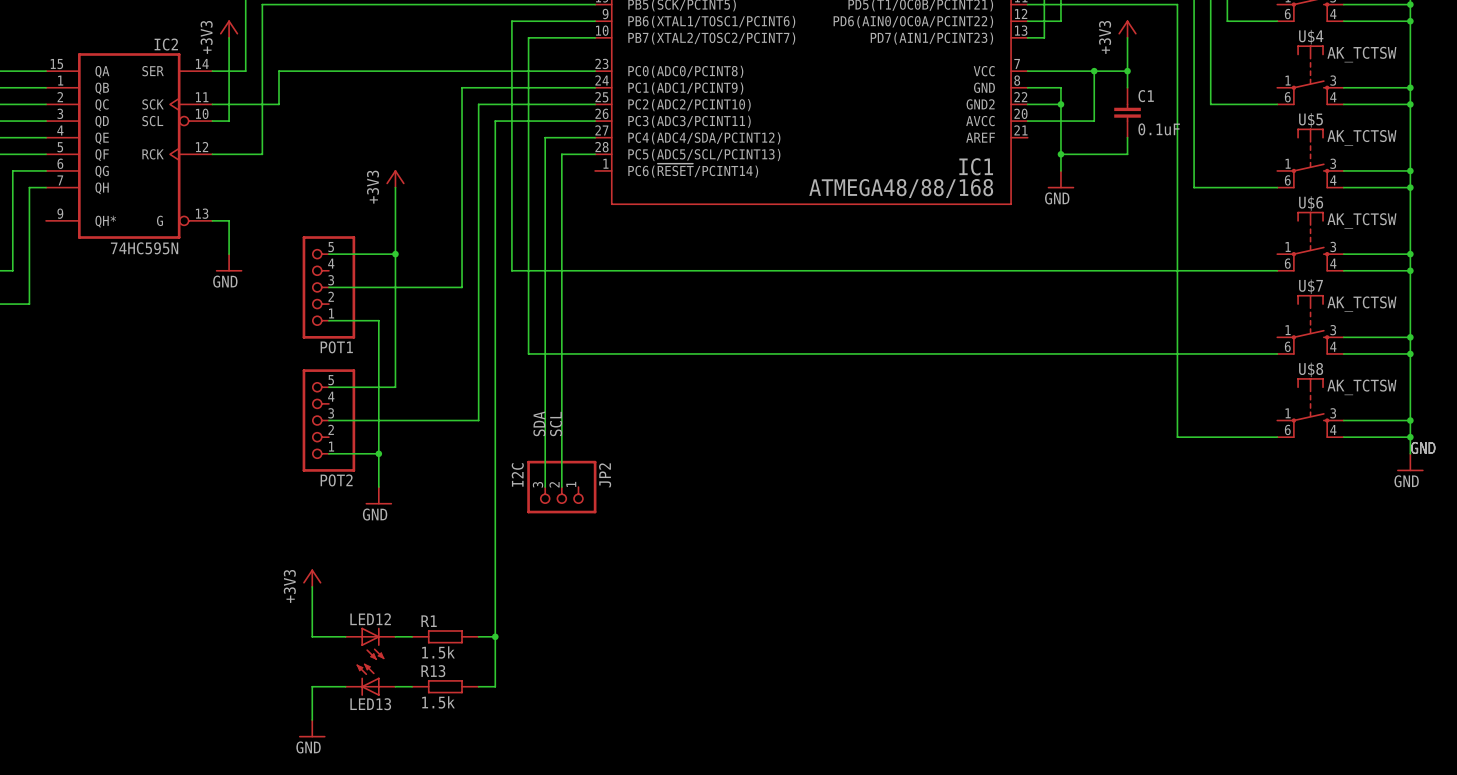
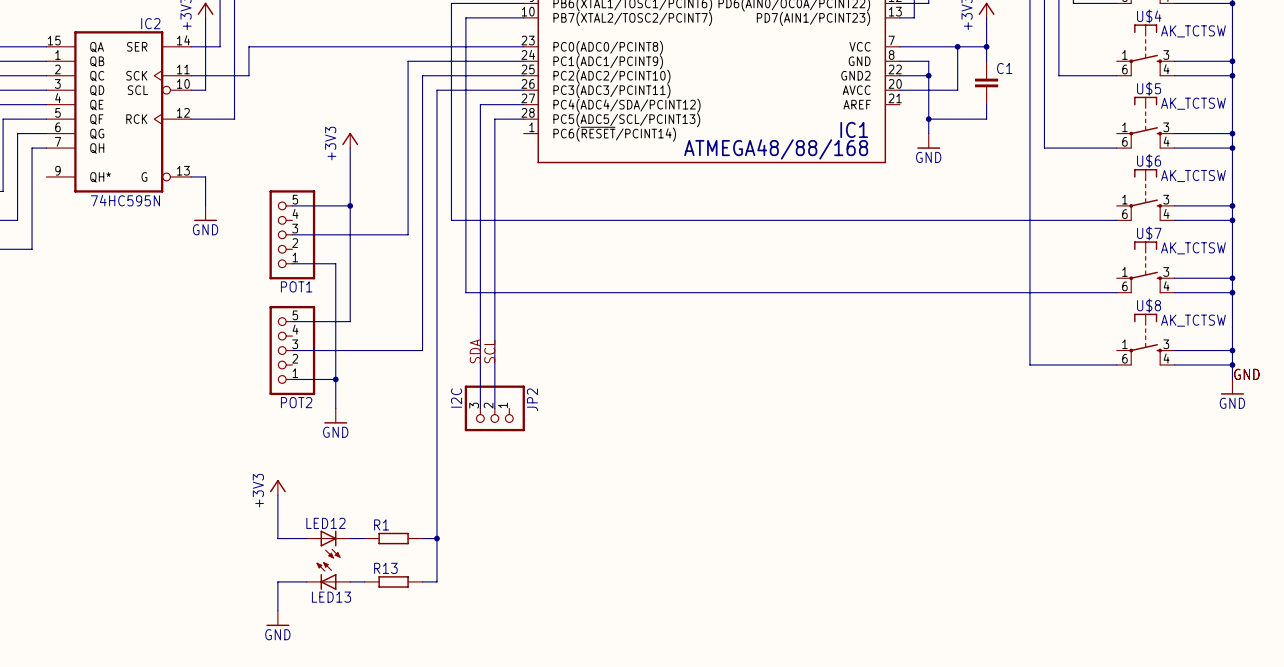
C1 value: 0.1uF (1159, 129) -> none
R1 value: 1.5k (438, 652) -> none
R13 value: 1.5k (438, 702) -> none

